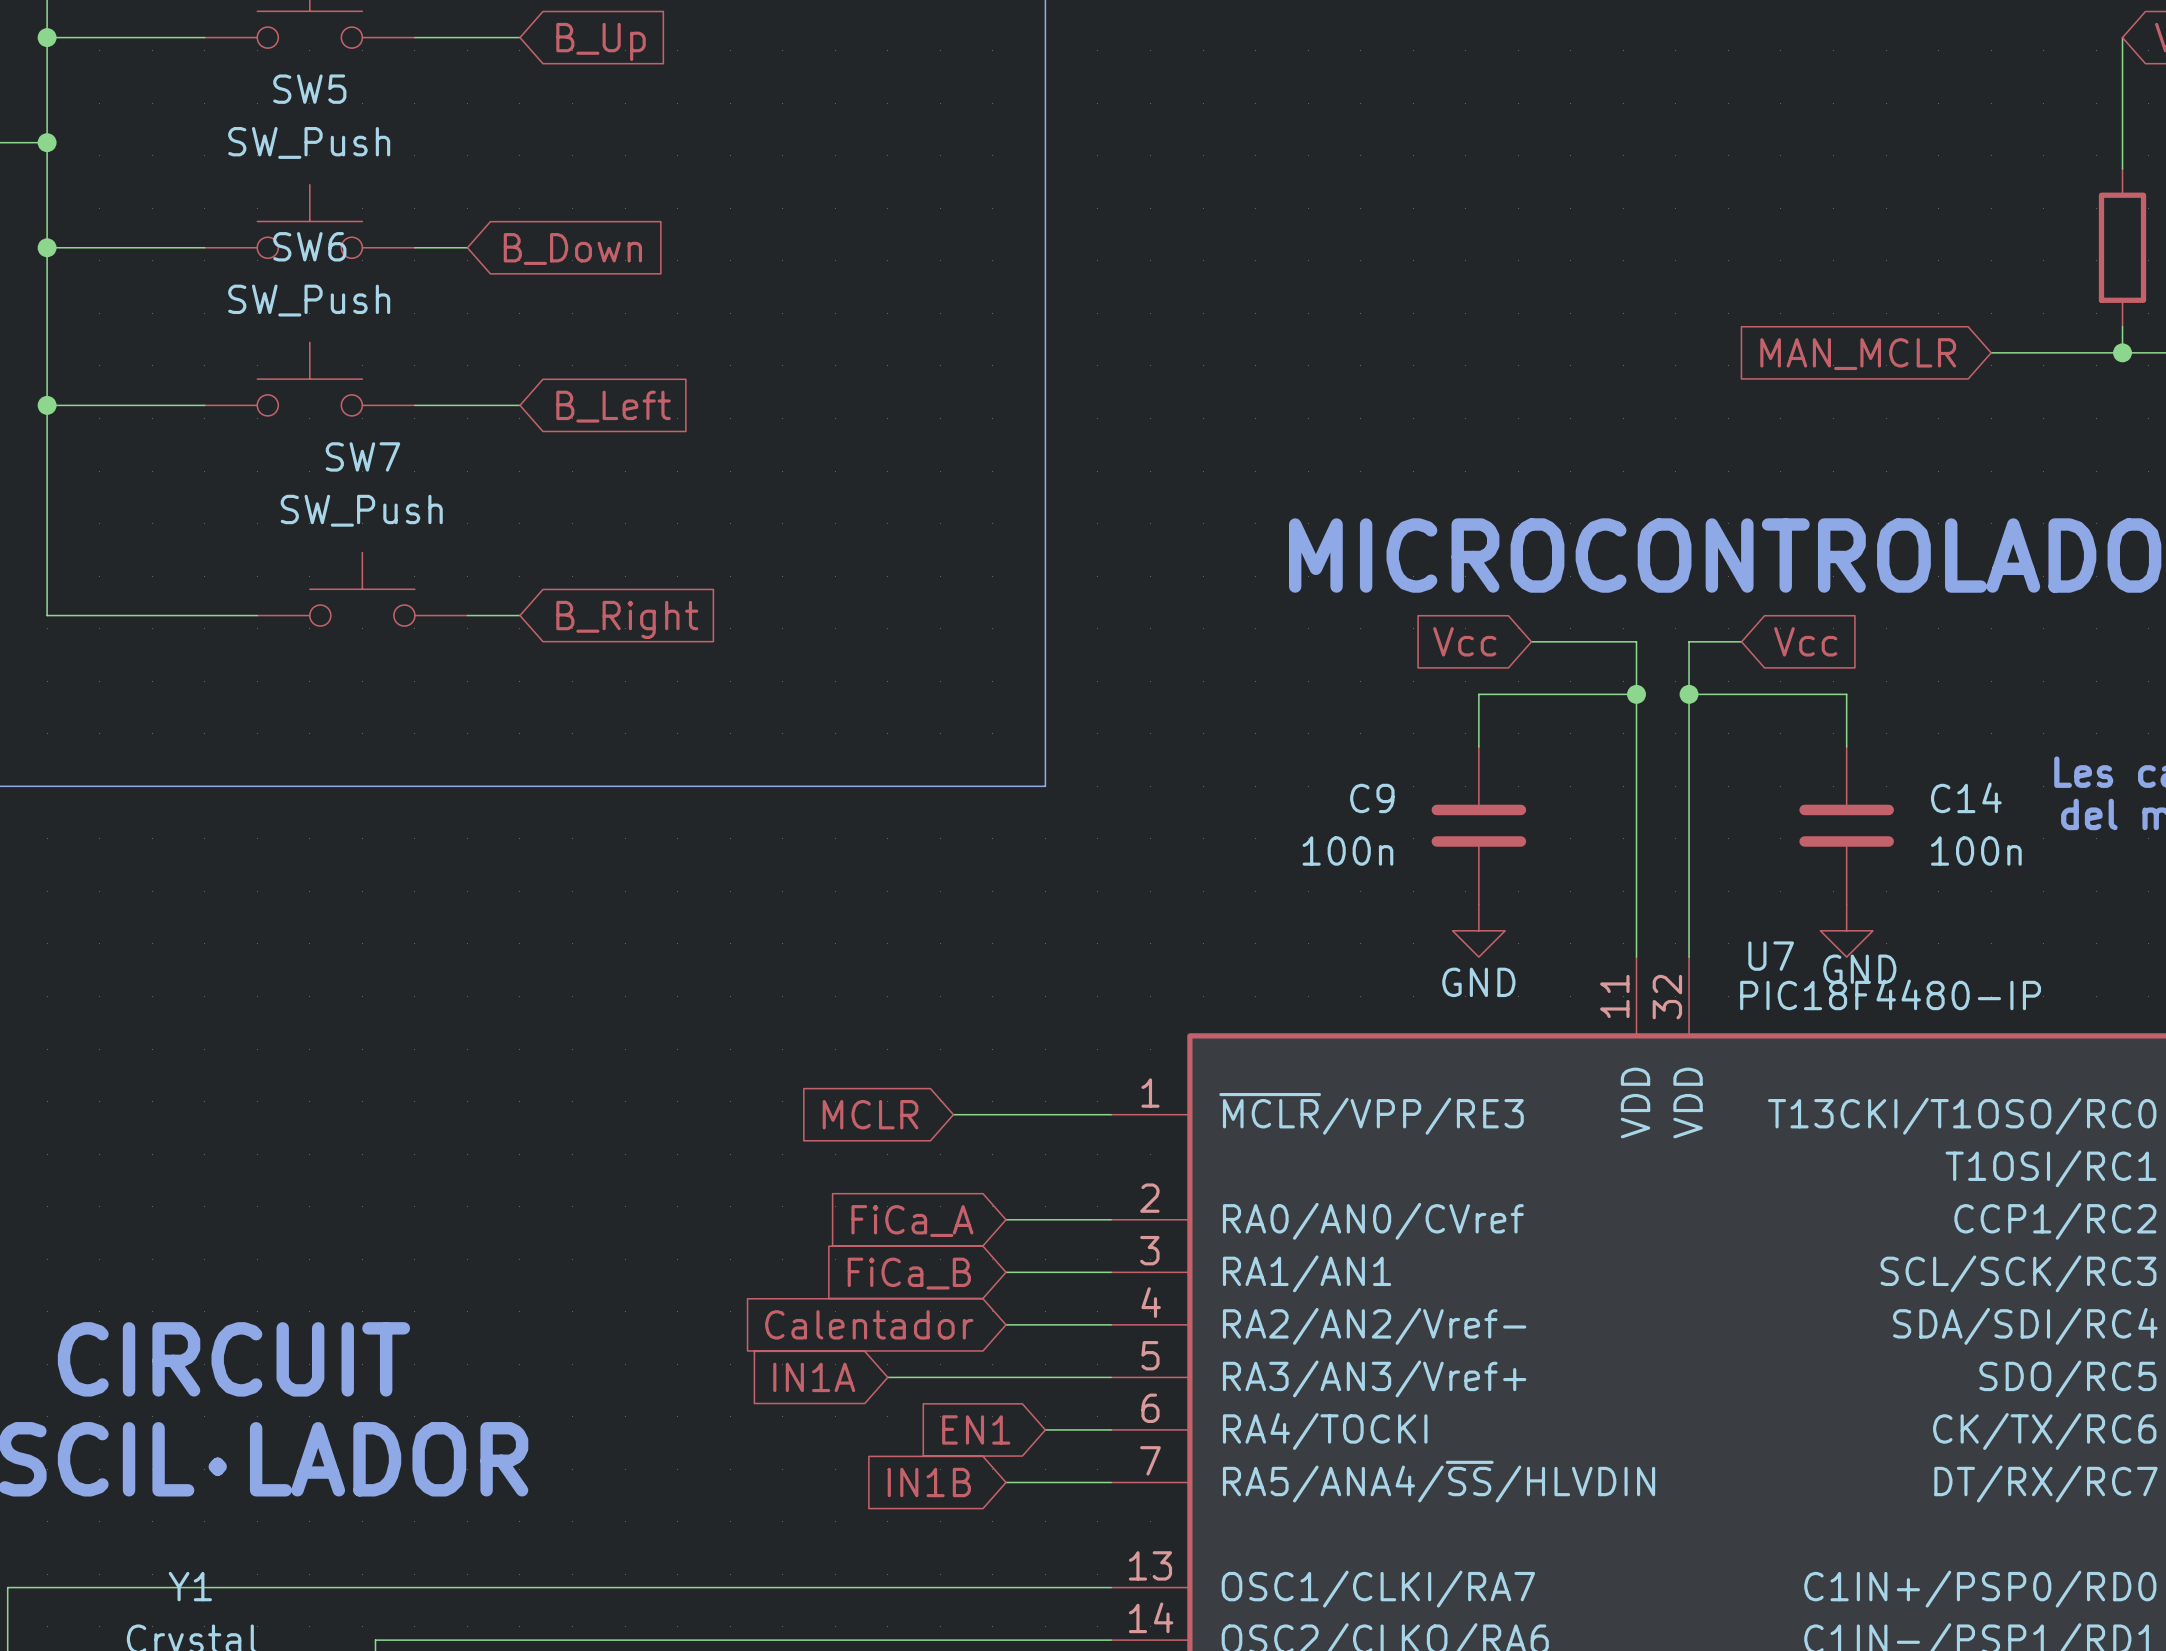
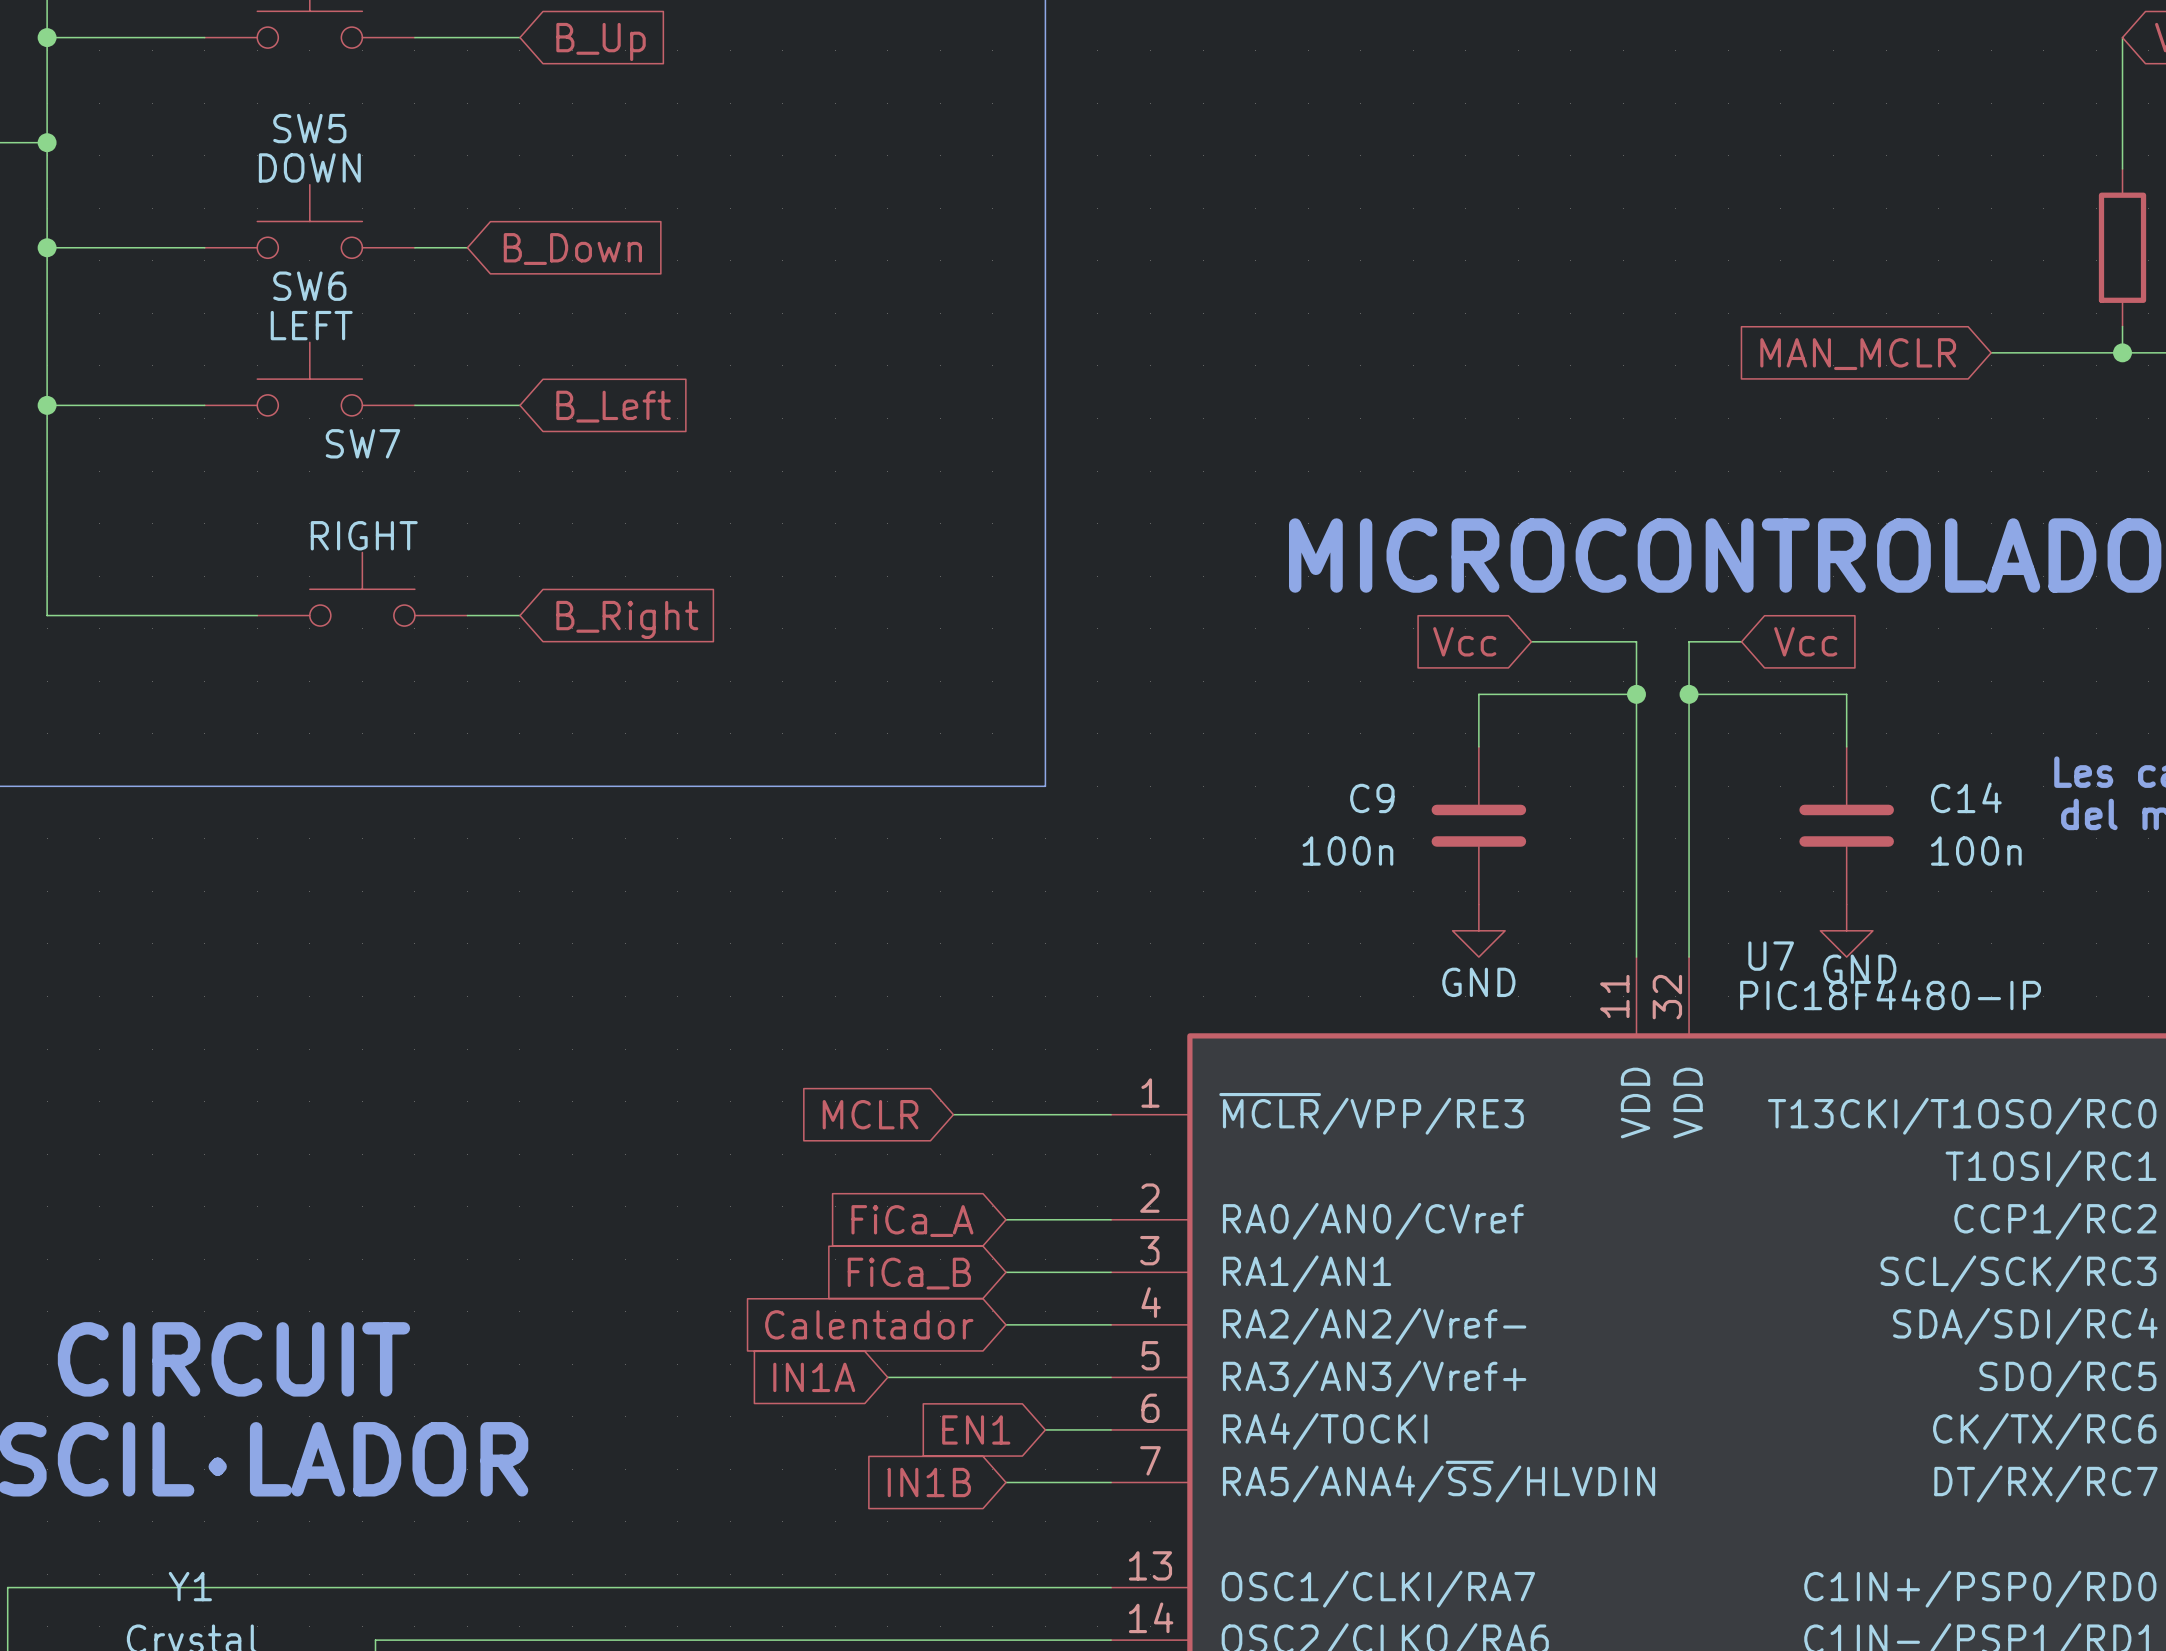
SW5 name position: SW5 (309, 89) -> SW5 (309, 128)
SW5 value: SW_Push (309, 142) -> DOWN (309, 167)
SW6 name position: SW6 (309, 246) -> SW6 (309, 286)
SW6 value: SW_Push (309, 300) -> LEFT (311, 325)
SW7 name position: SW7 (362, 456) -> SW7 (362, 443)
SW7 value: SW_Push (361, 510) -> RIGHT (364, 535)

